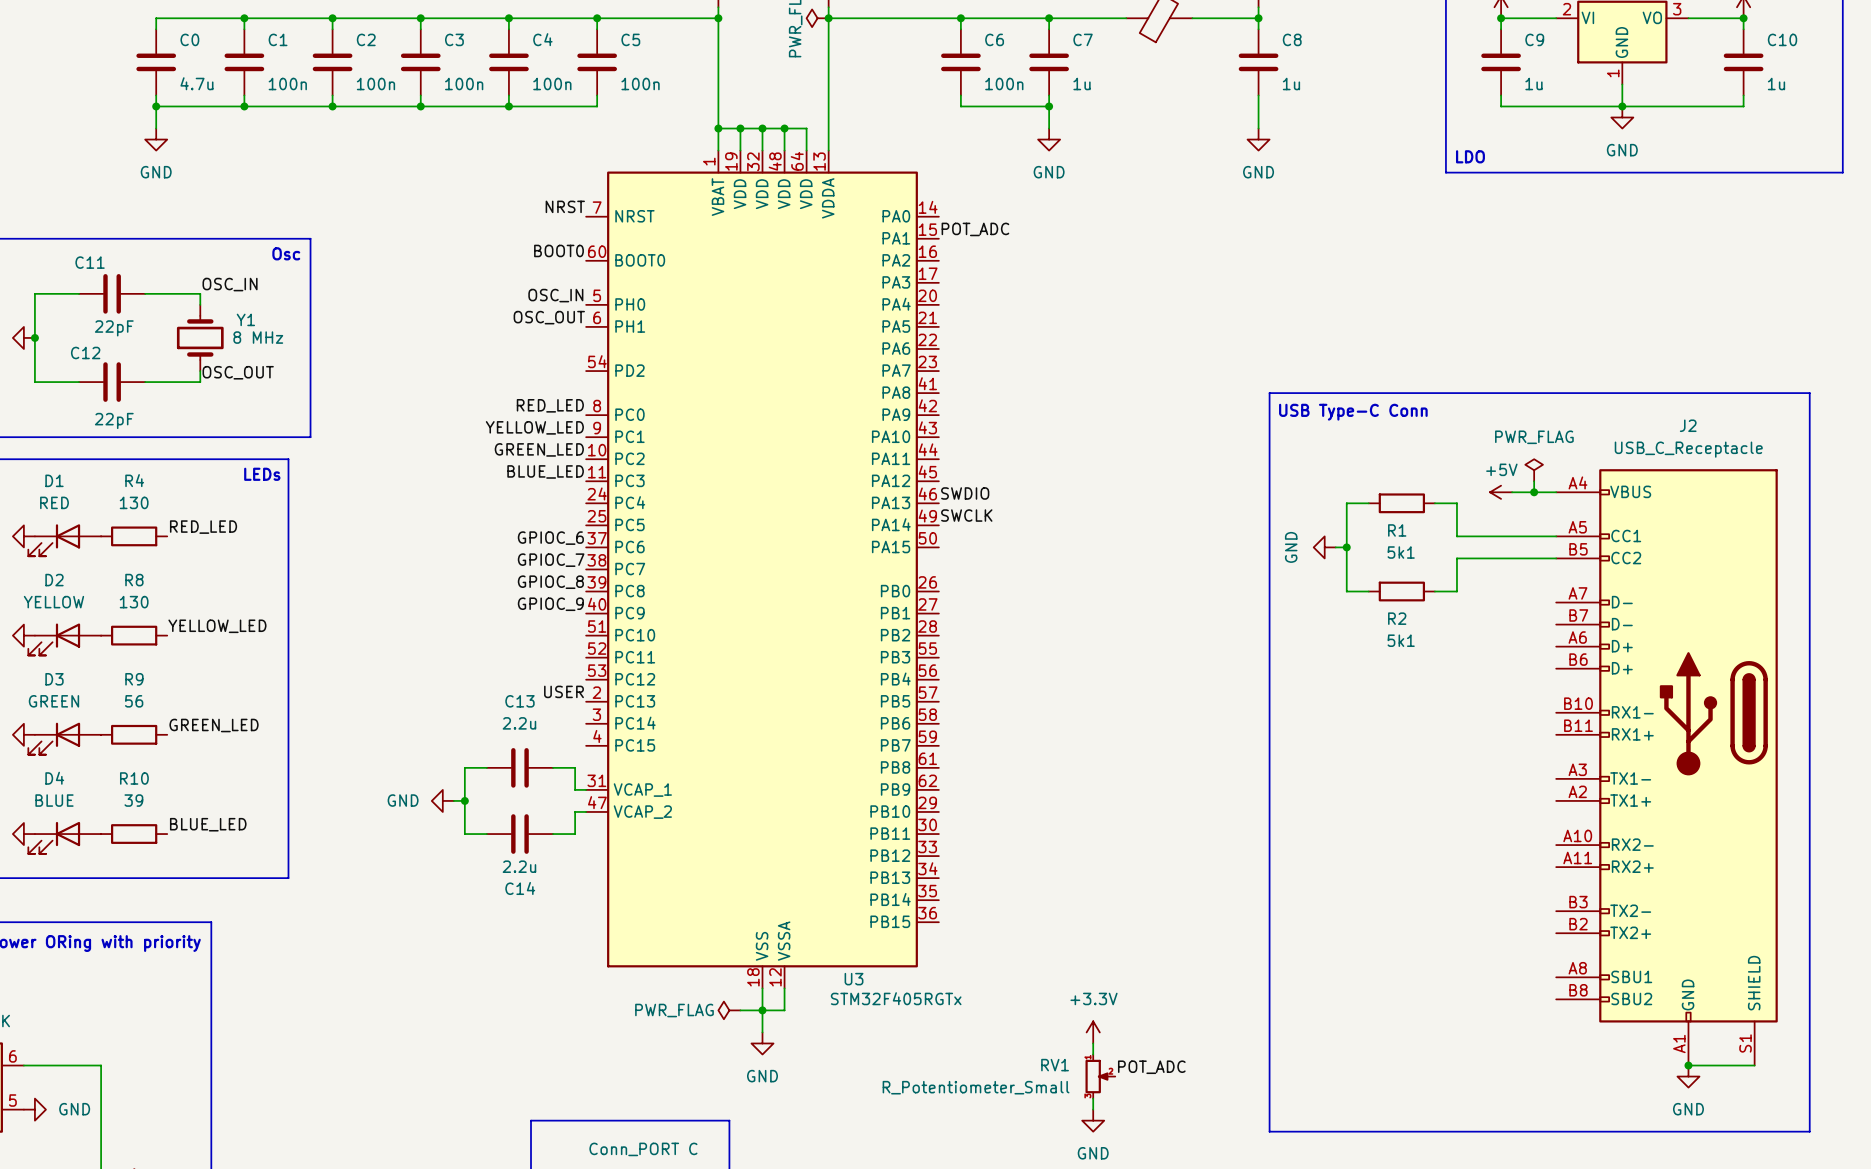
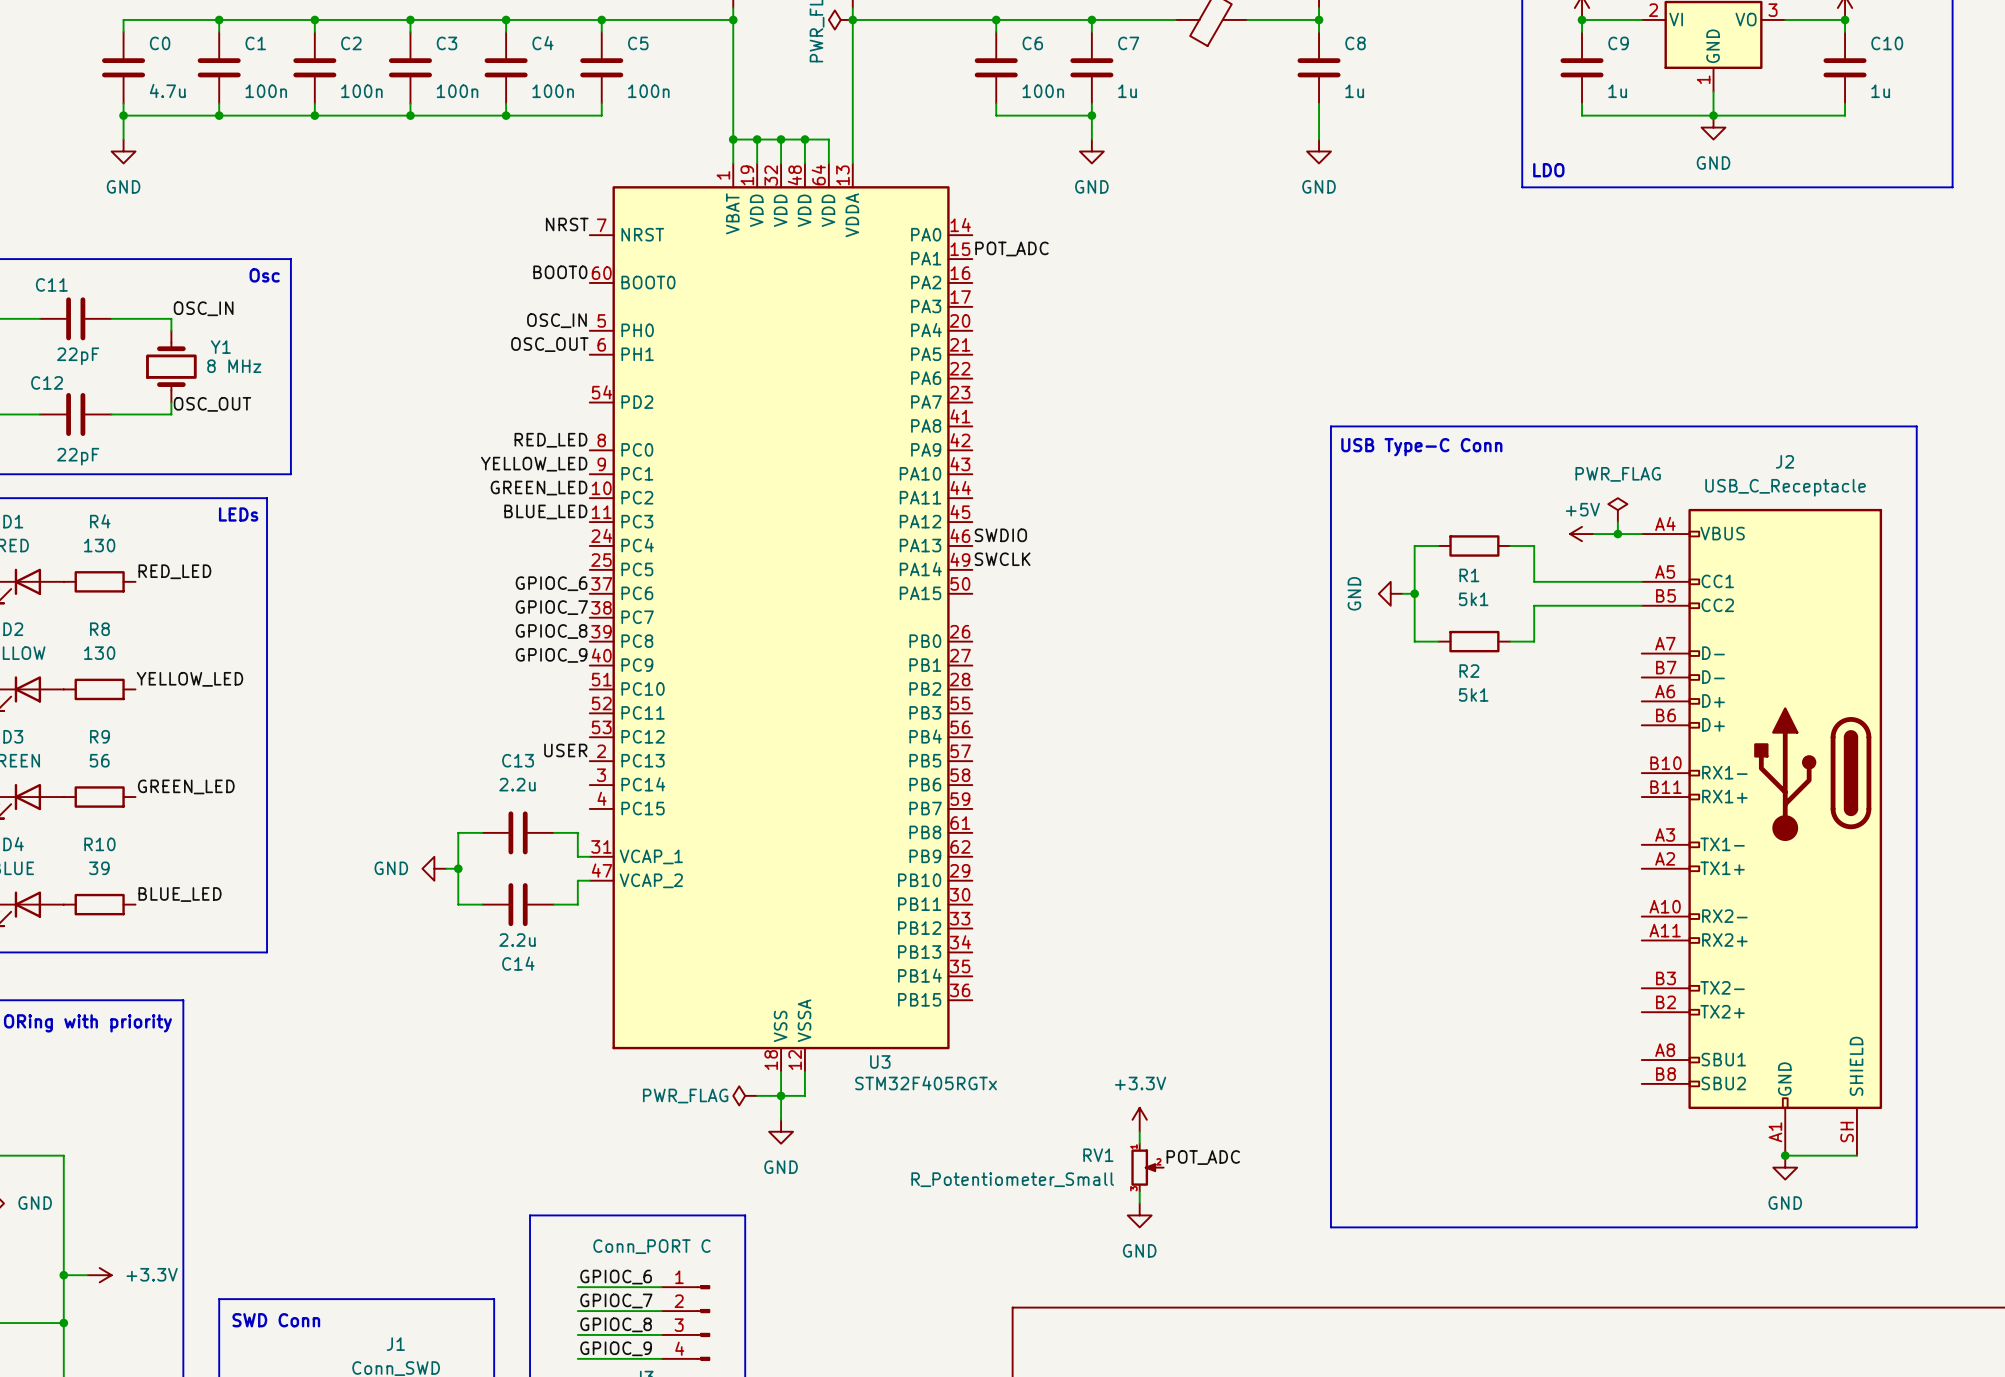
J2 pin number: S1 (1745, 1043) -> SH (1847, 1132)

